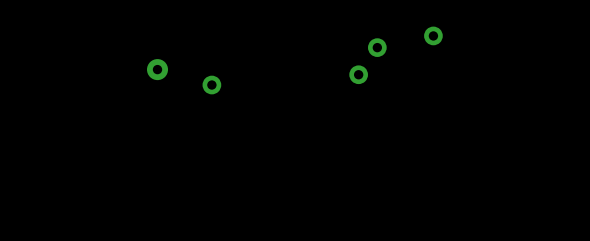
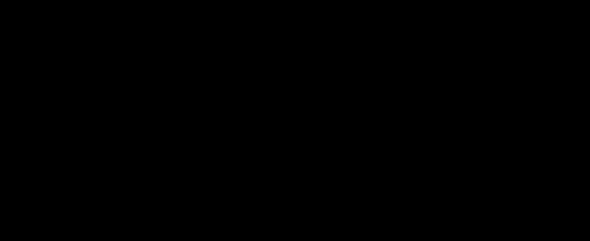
via: (433, 35) -> none
via: (377, 47) -> none
via: (157, 69) -> none
via: (358, 74) -> none
via: (211, 85) -> none

